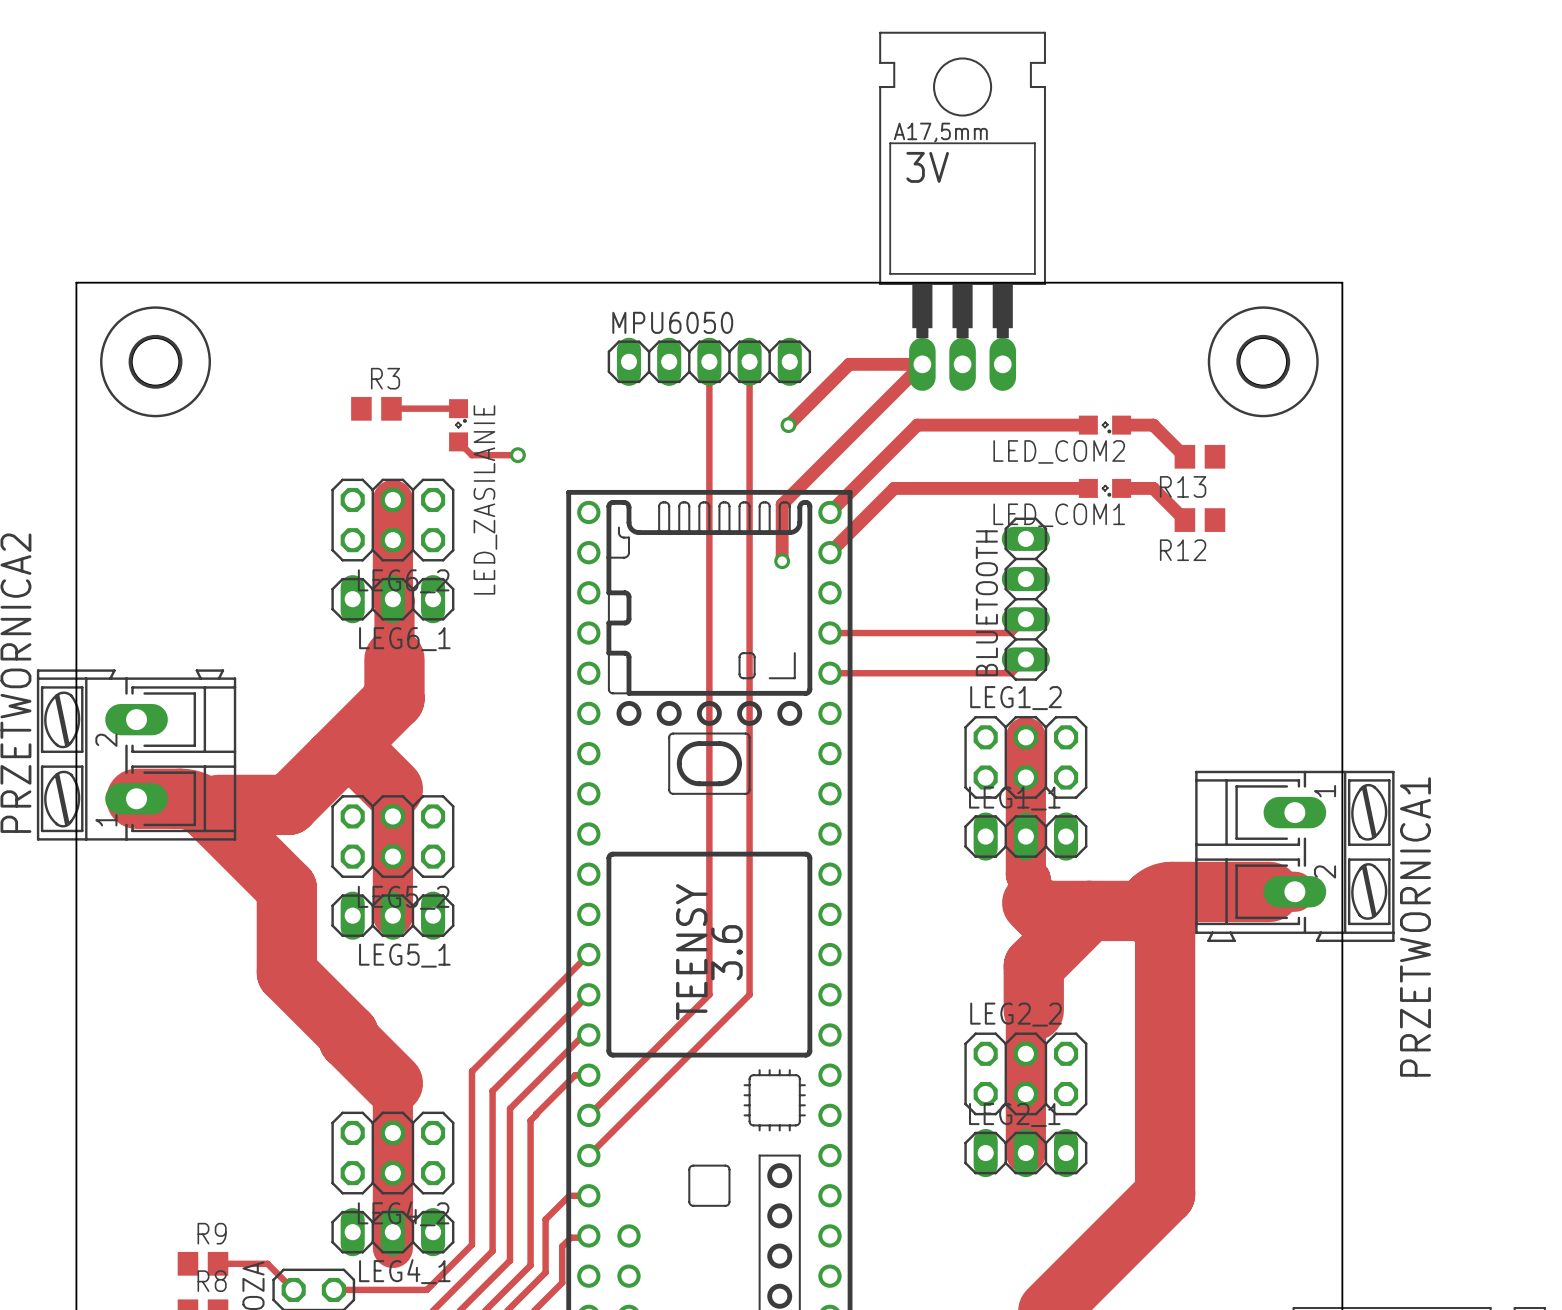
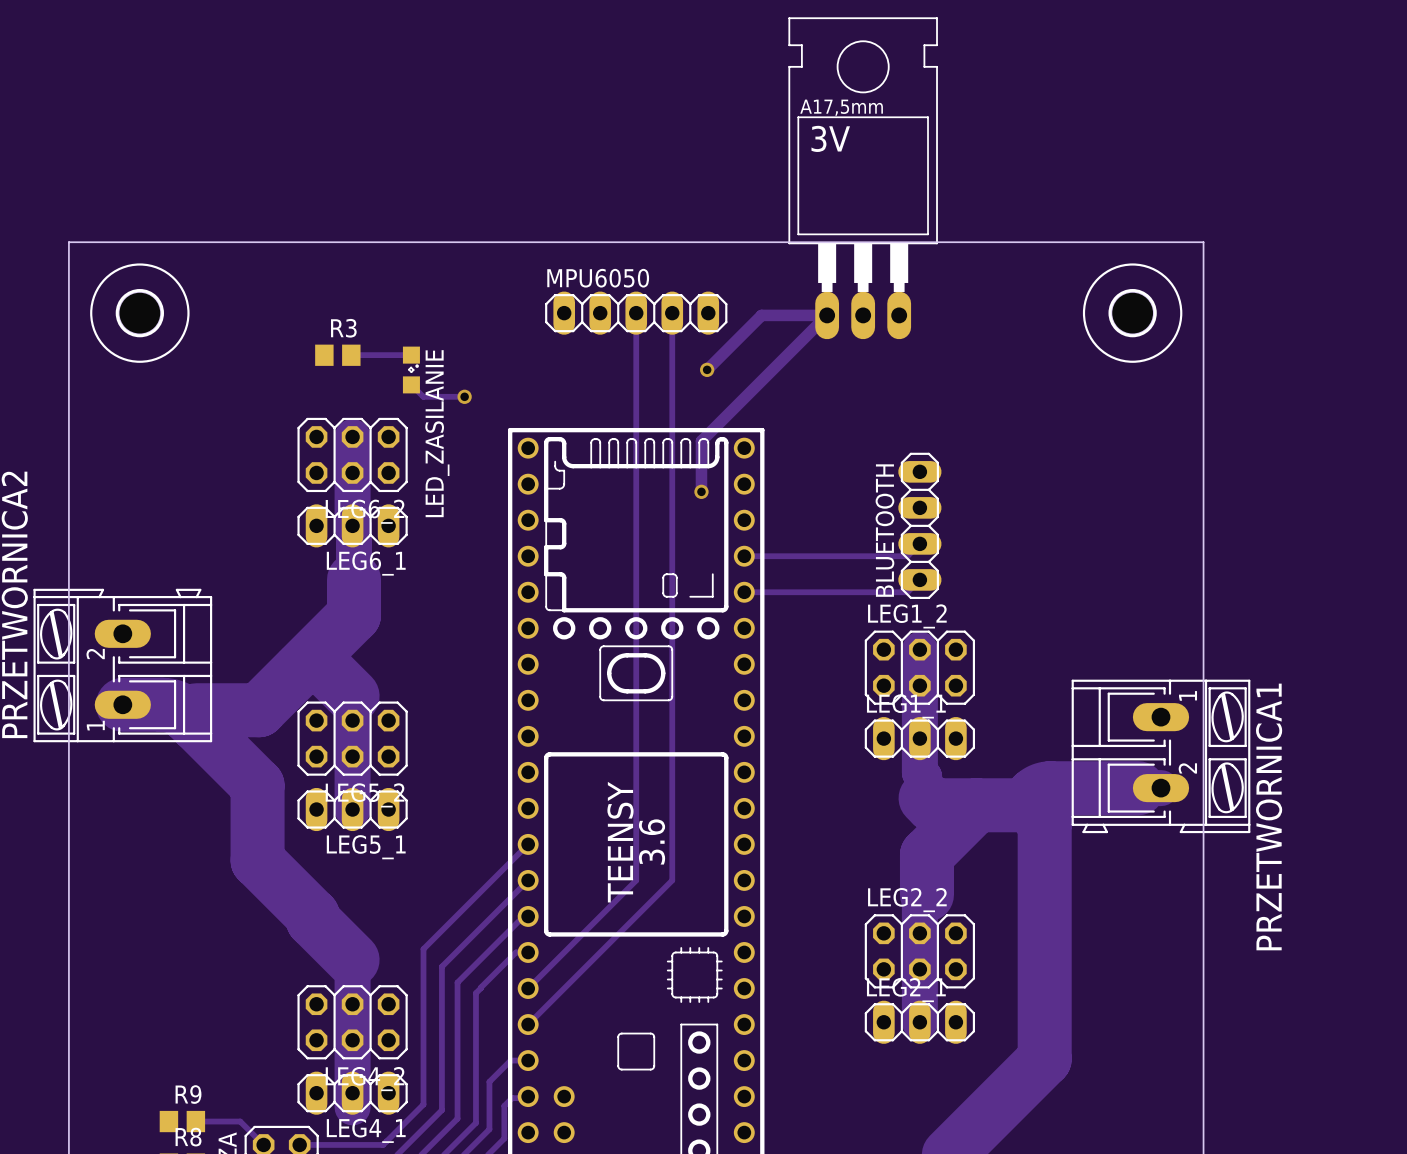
track: (1088, 425) (917, 425) (829, 512) -> none
LED_COM2: (1104, 425) -> none
track: (1121, 425) (1153, 425) (1184, 456) -> none
R13: (1199, 456) -> none
track: (1088, 488) (894, 488) (829, 552) -> none
LED_COM1: (1104, 488) -> none
track: (1121, 488) (1153, 488) (1184, 520) -> none
R12: (1199, 520) -> none

